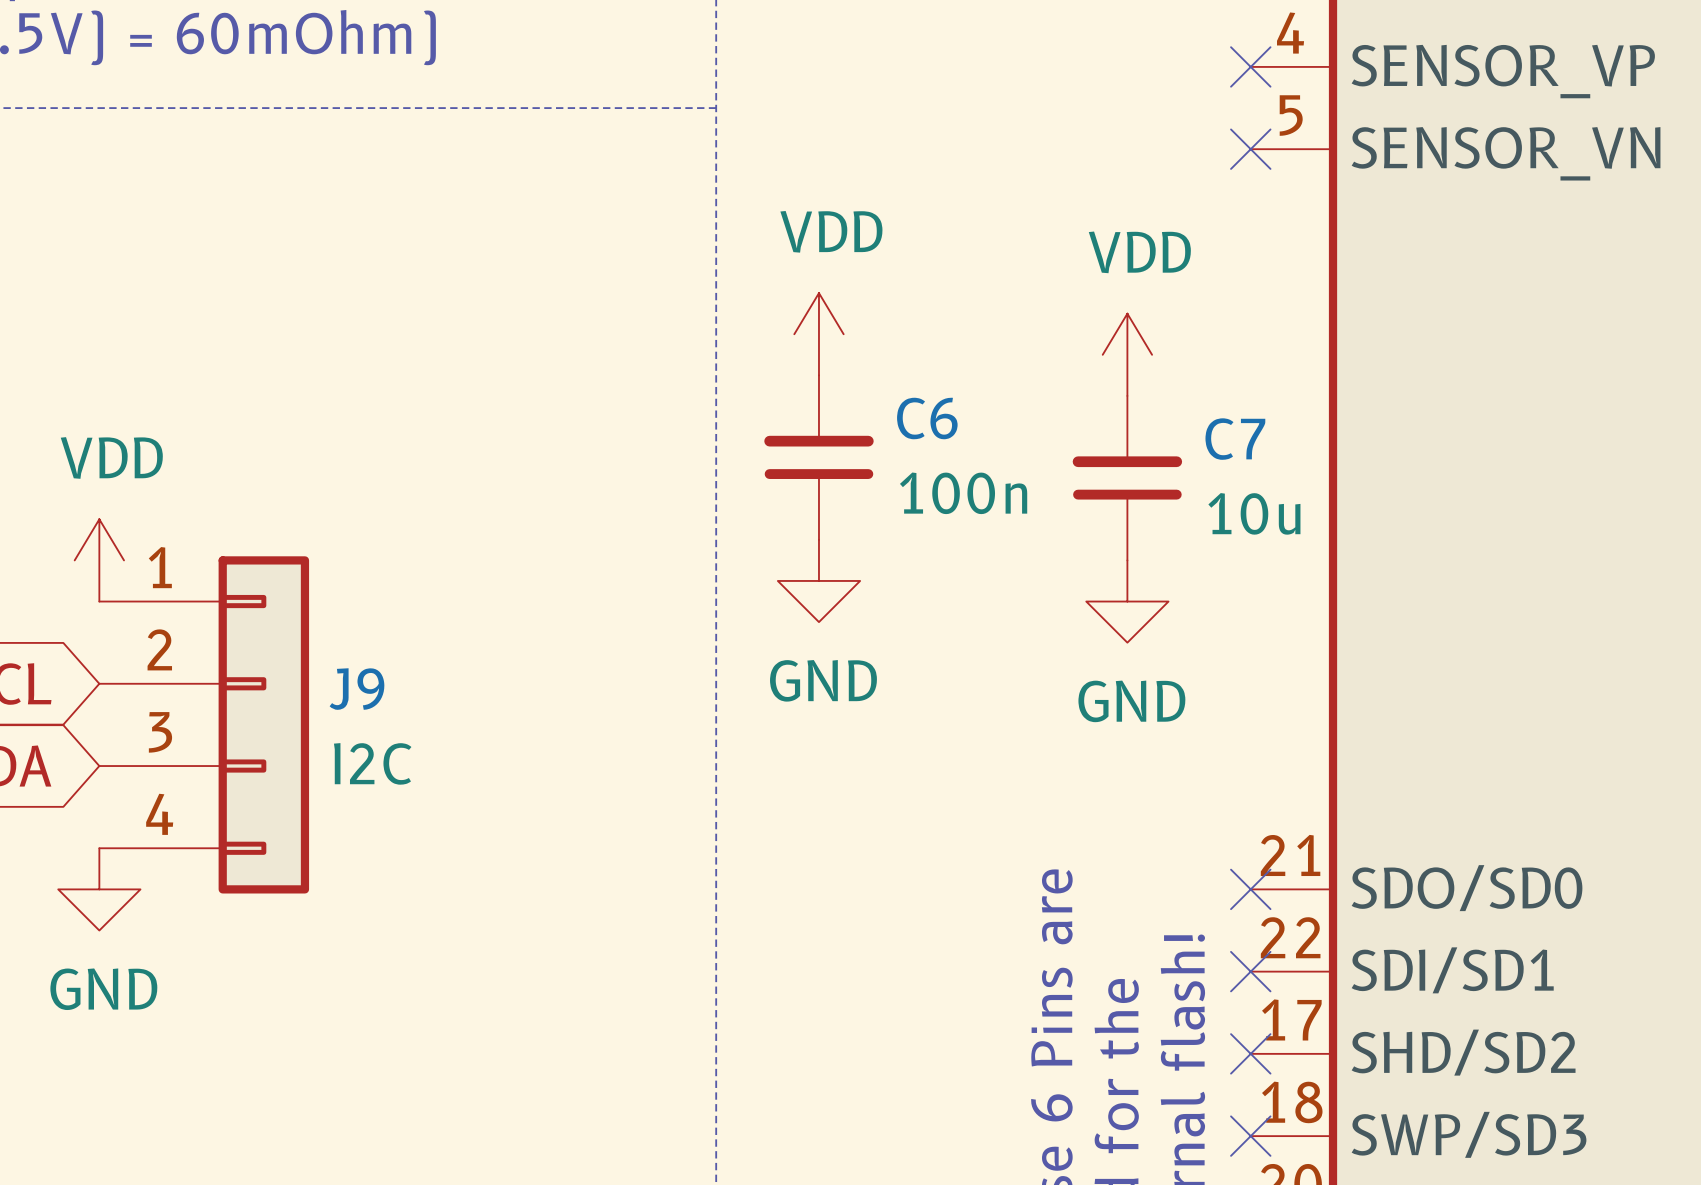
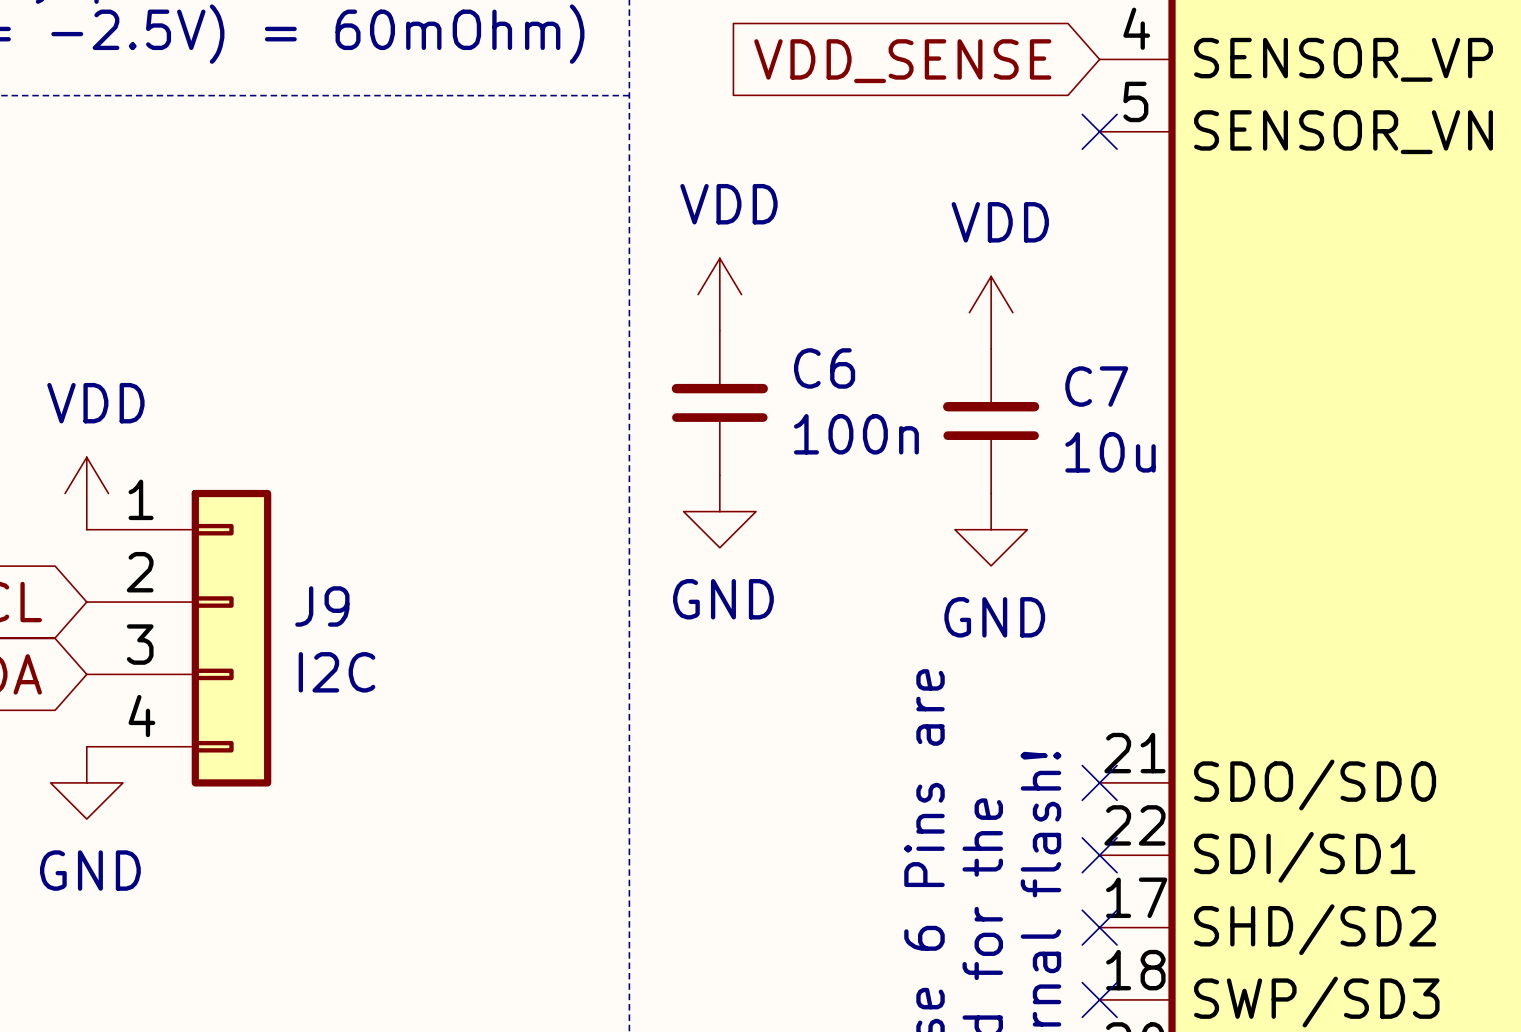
no-connect mark: (1250, 66) -> none
global label: none -> VDD_SENSE (902, 61)

